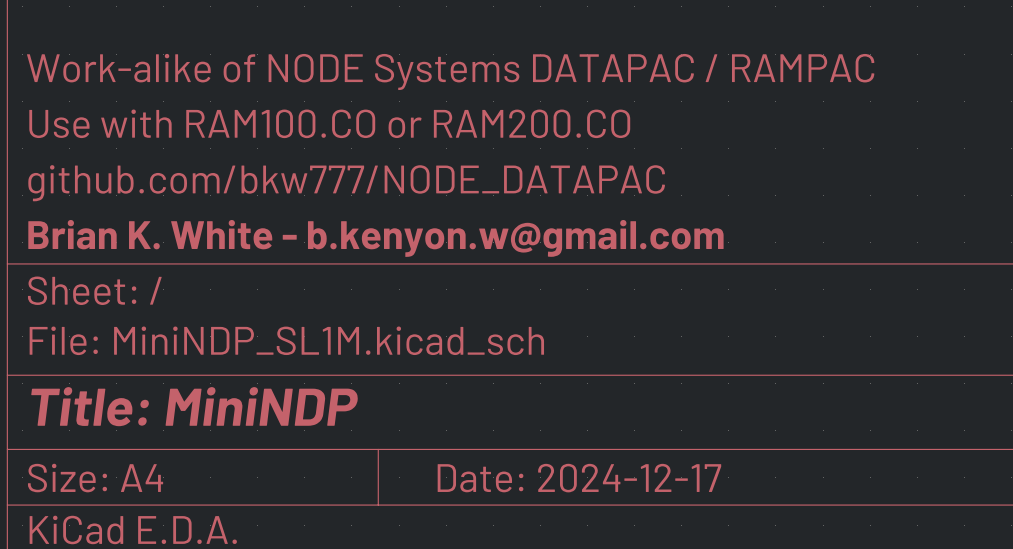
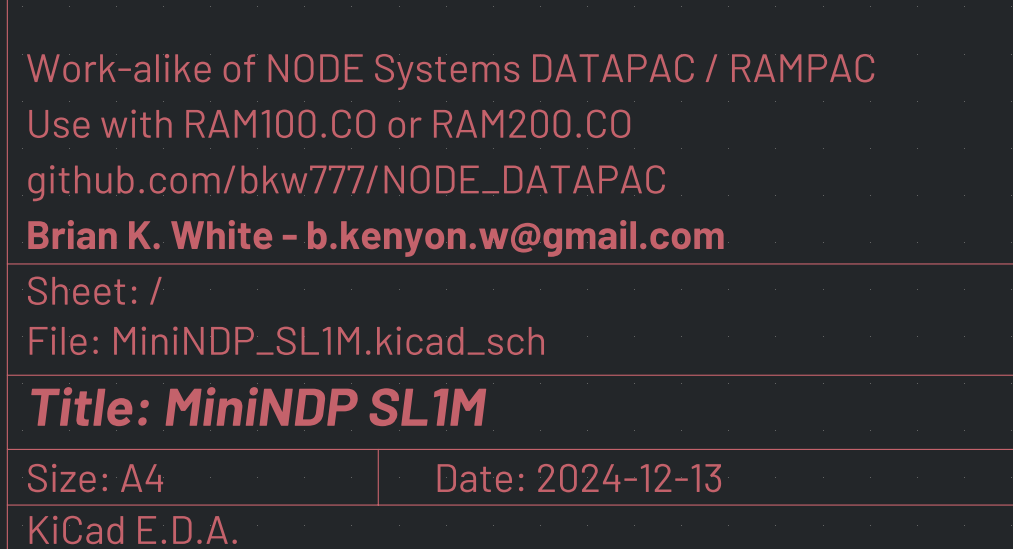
title block: Title: MiniNDP (194, 406) -> Title: MiniNDP SL1M (258, 406)
title block: Date: 2024-12-17 (579, 478) -> Date: 2024-12-13 (579, 478)

